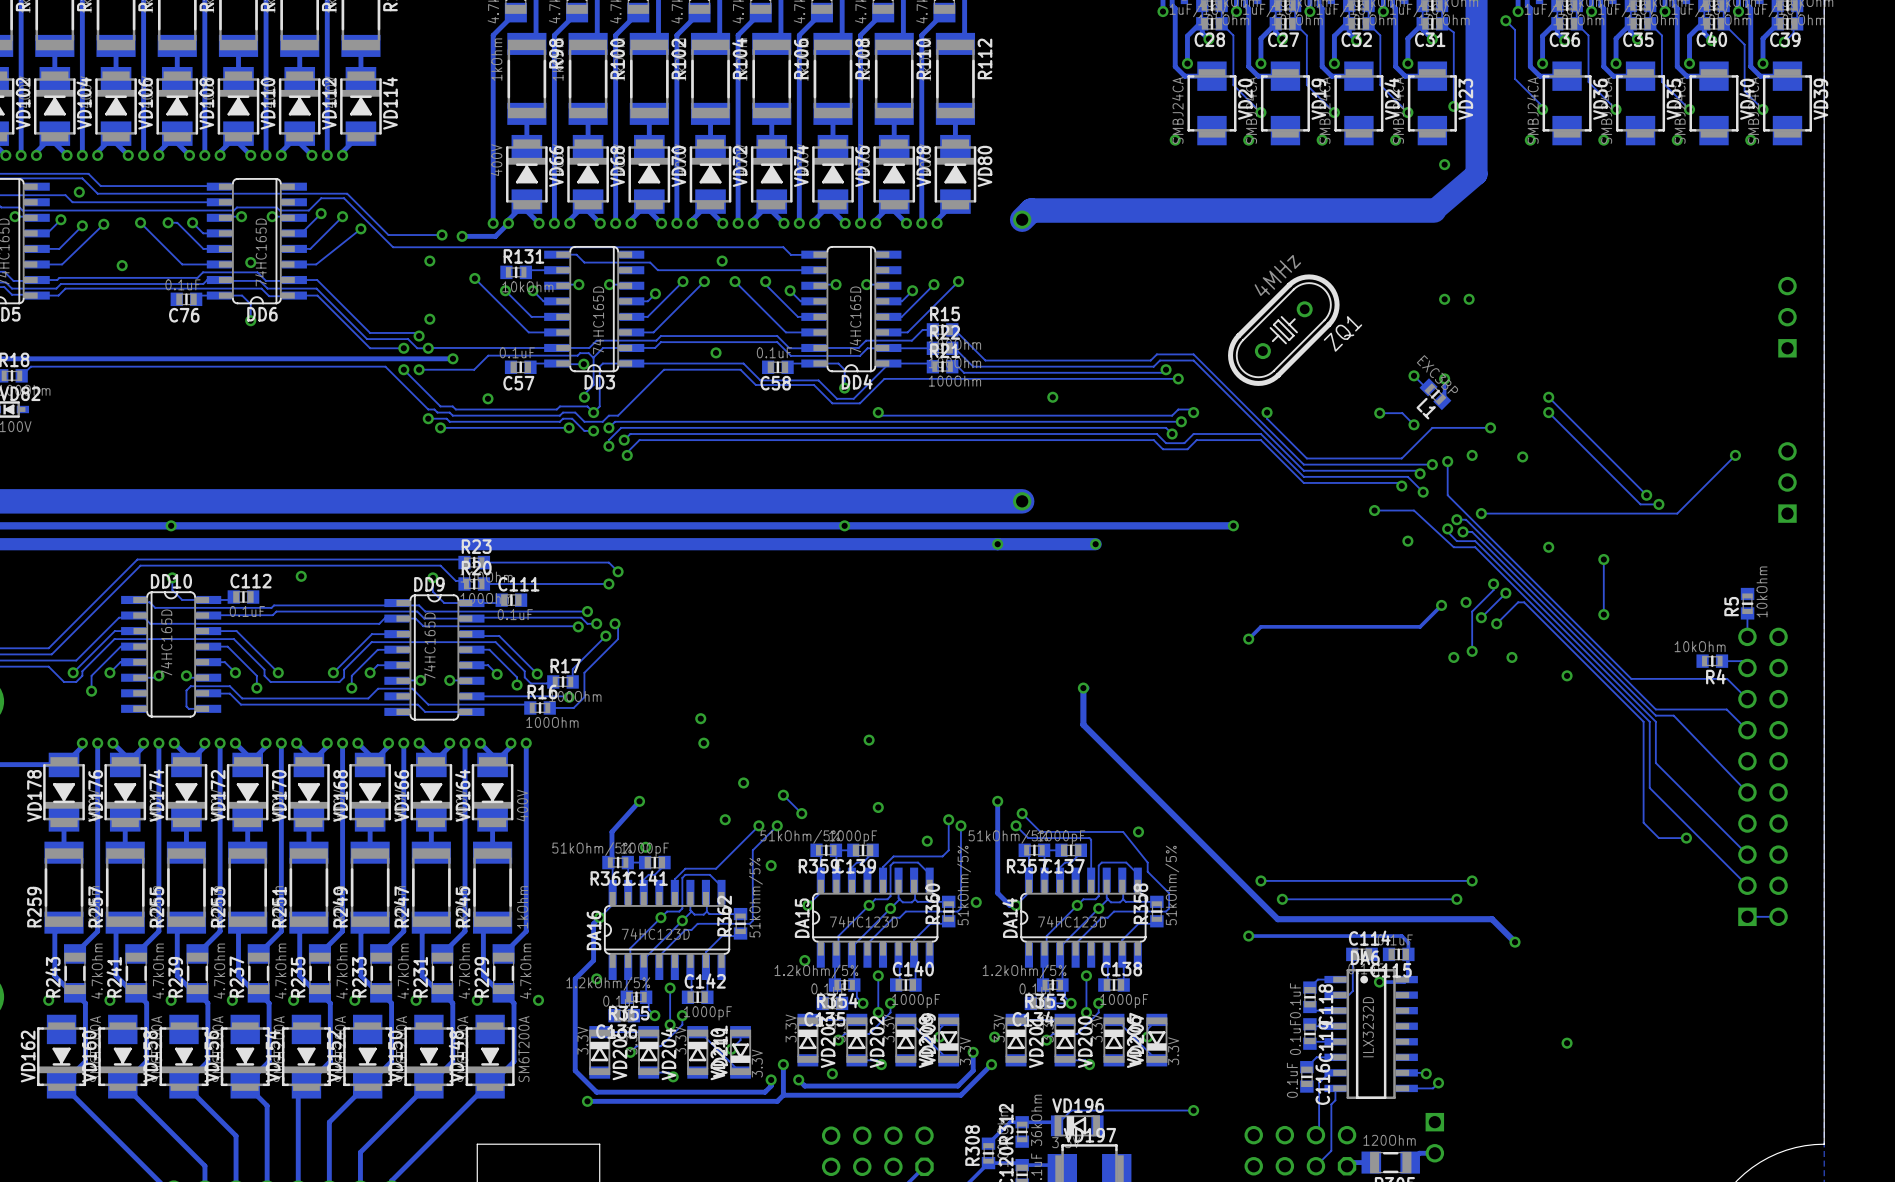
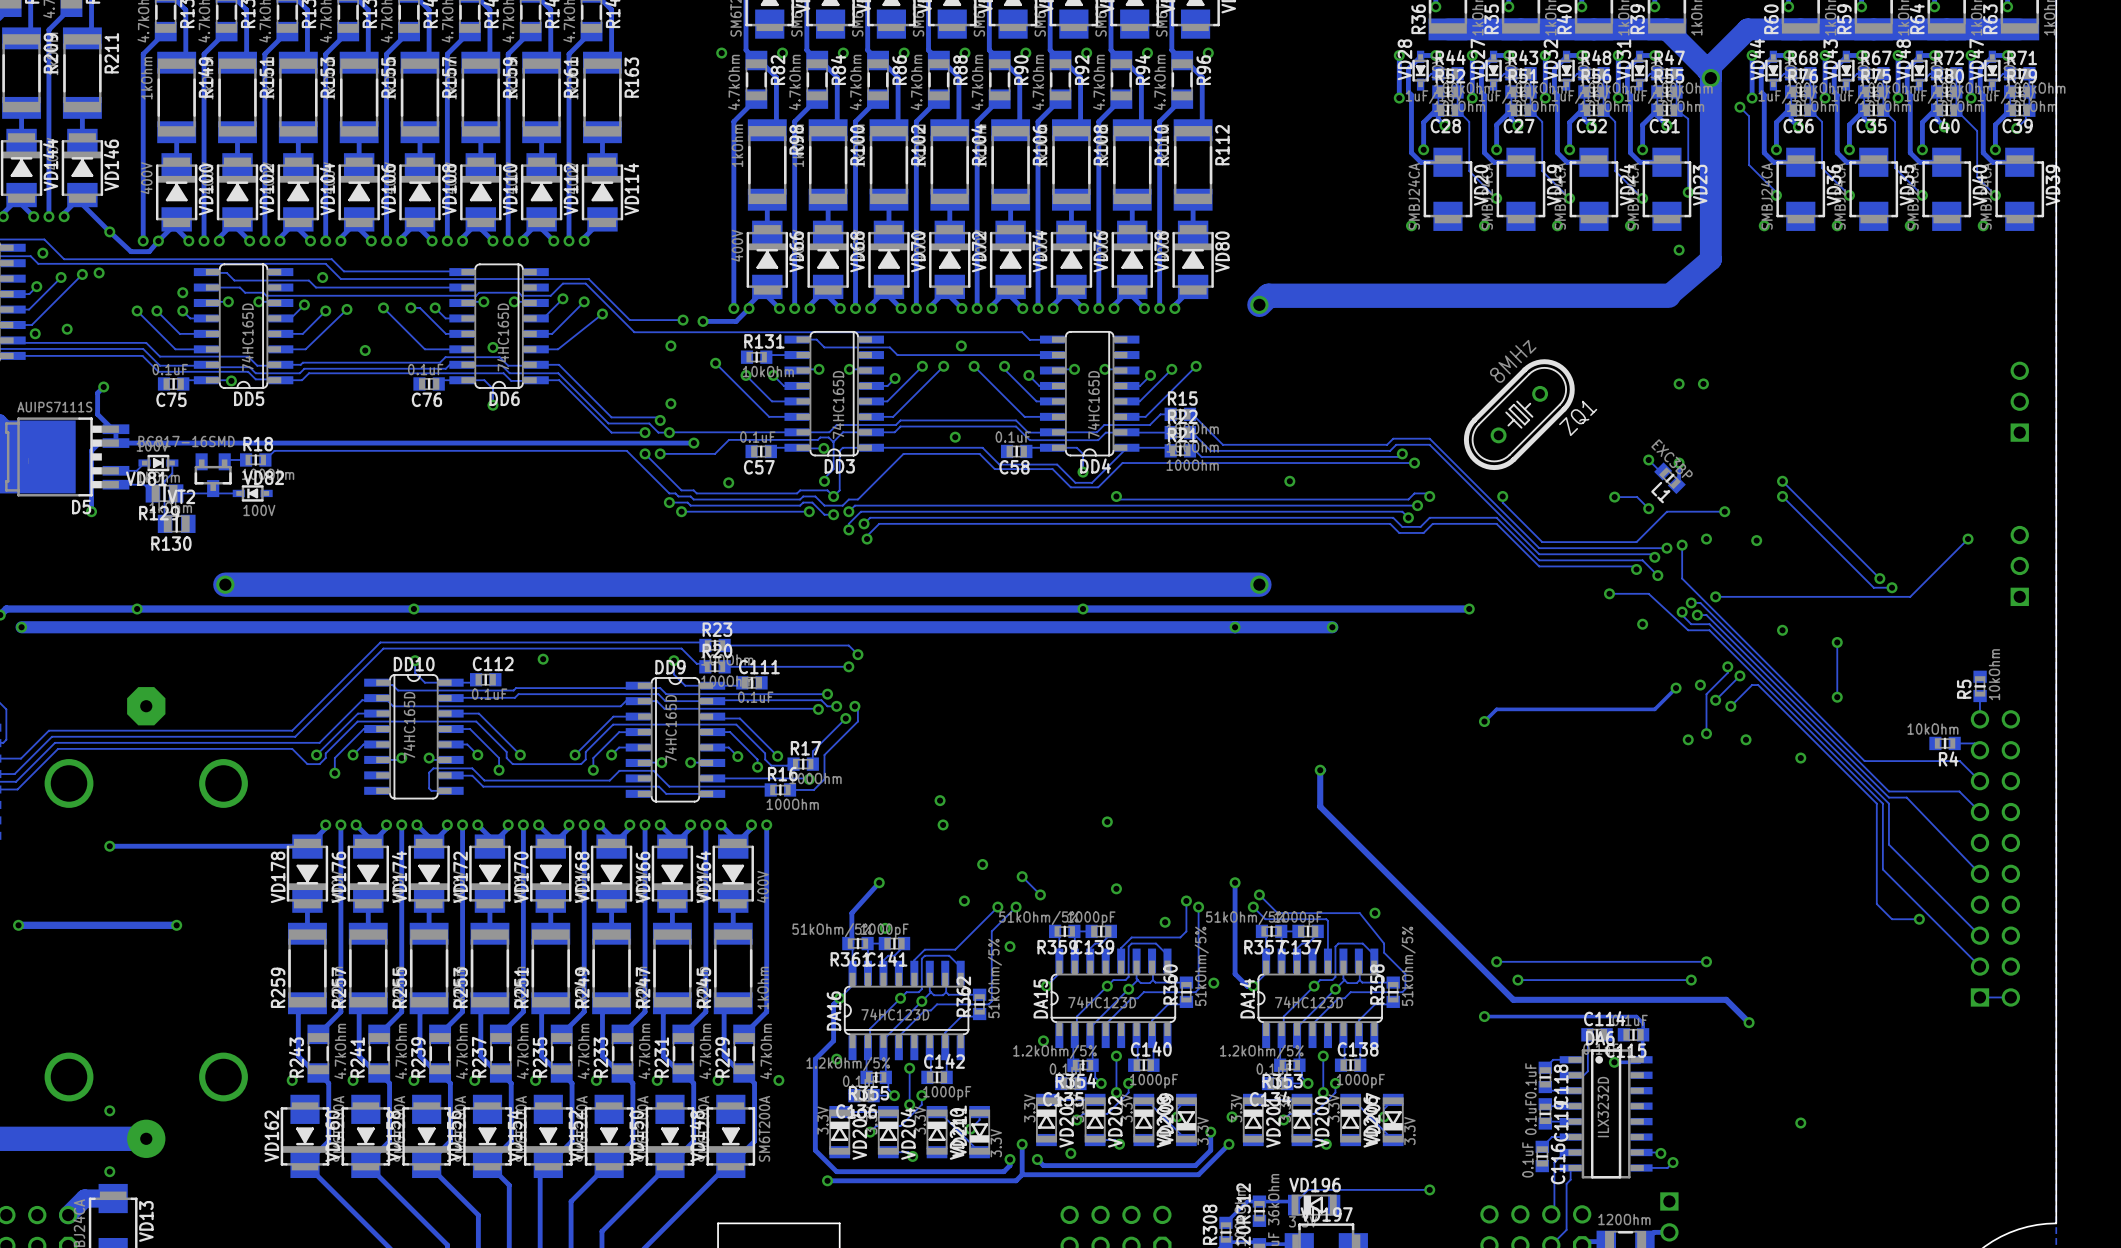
ZQ1 value: 4MHz (1277, 275) -> 8MHz (1513, 361)

